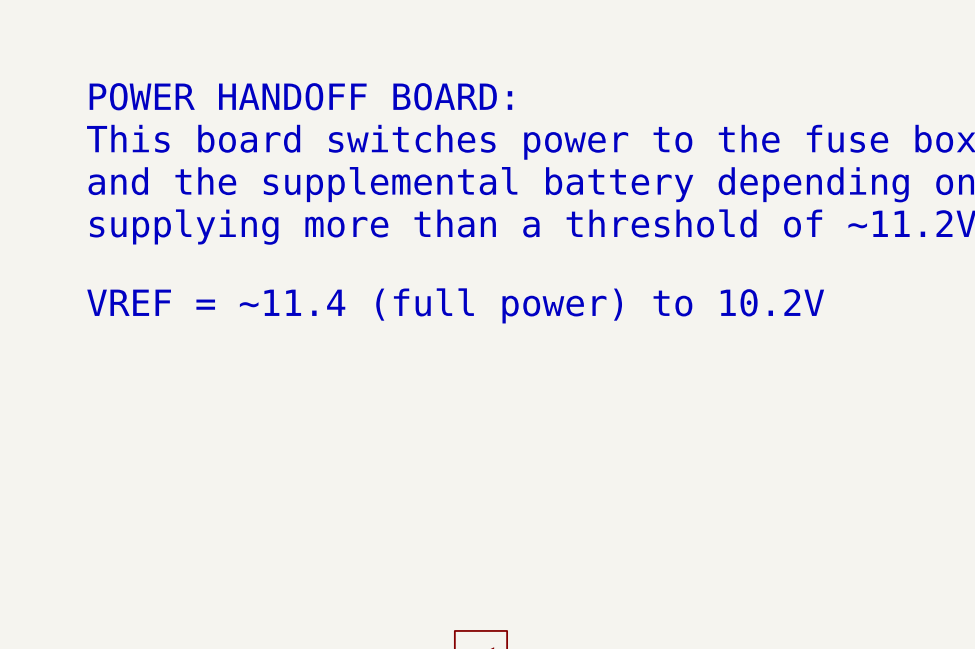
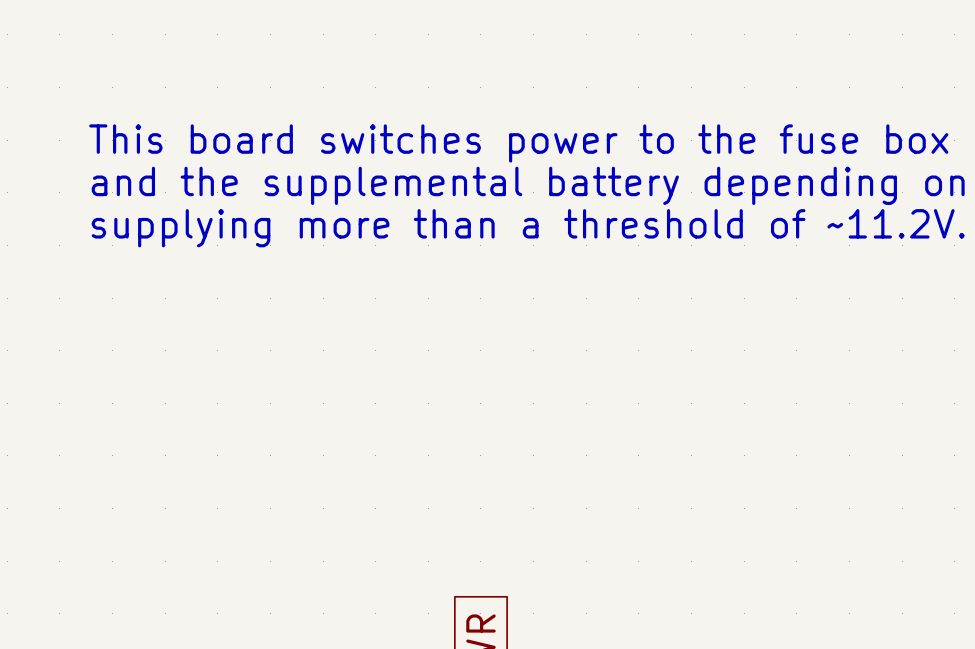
text: POWER HANDOFF BOARD: (300, 96) -> none
text: VREF = ~11.4 (full power) to 10.2V (455, 305) -> none

